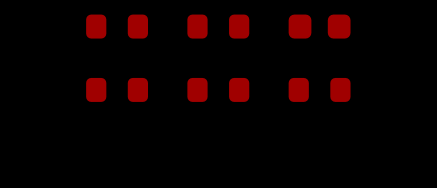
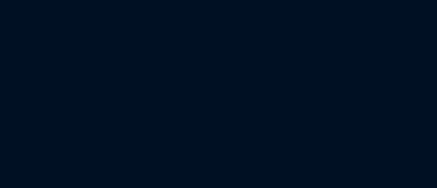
part: (117, 26) -> none
part: (218, 26) -> none
part: (319, 26) -> none
part: (117, 89) -> none
part: (218, 89) -> none
part: (319, 89) -> none

